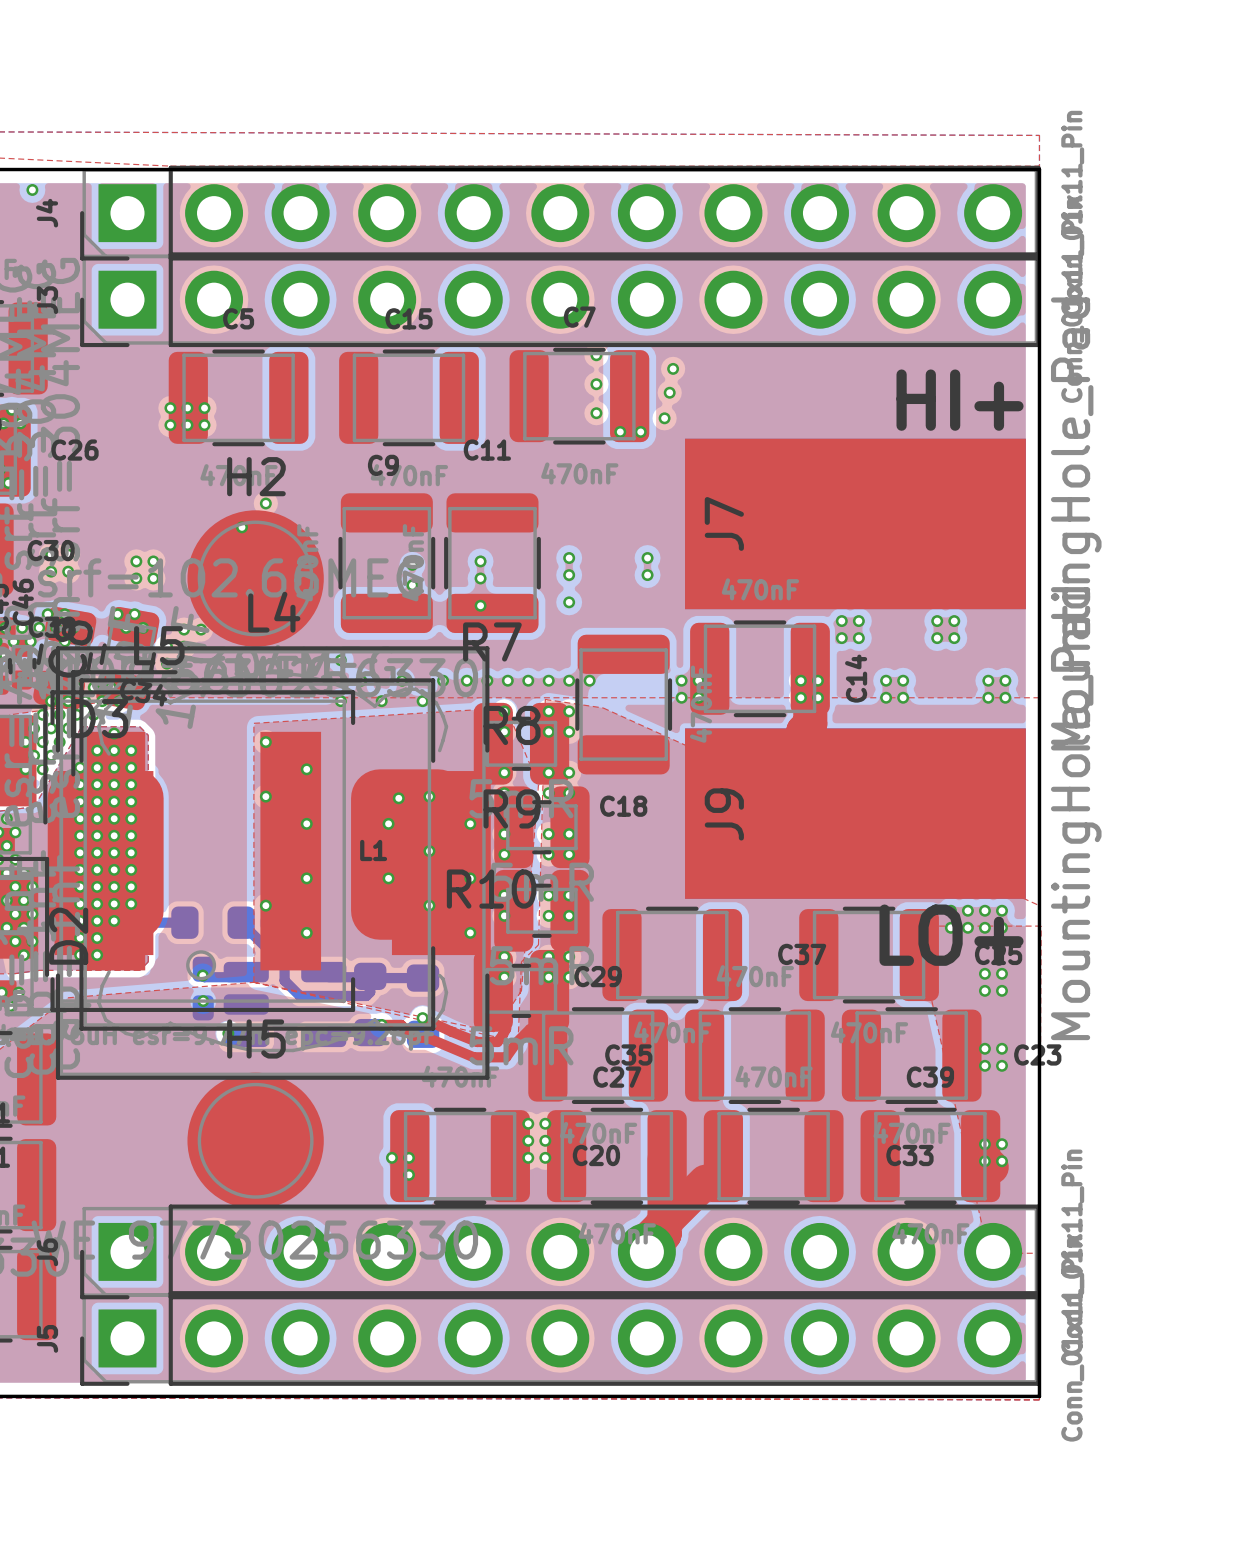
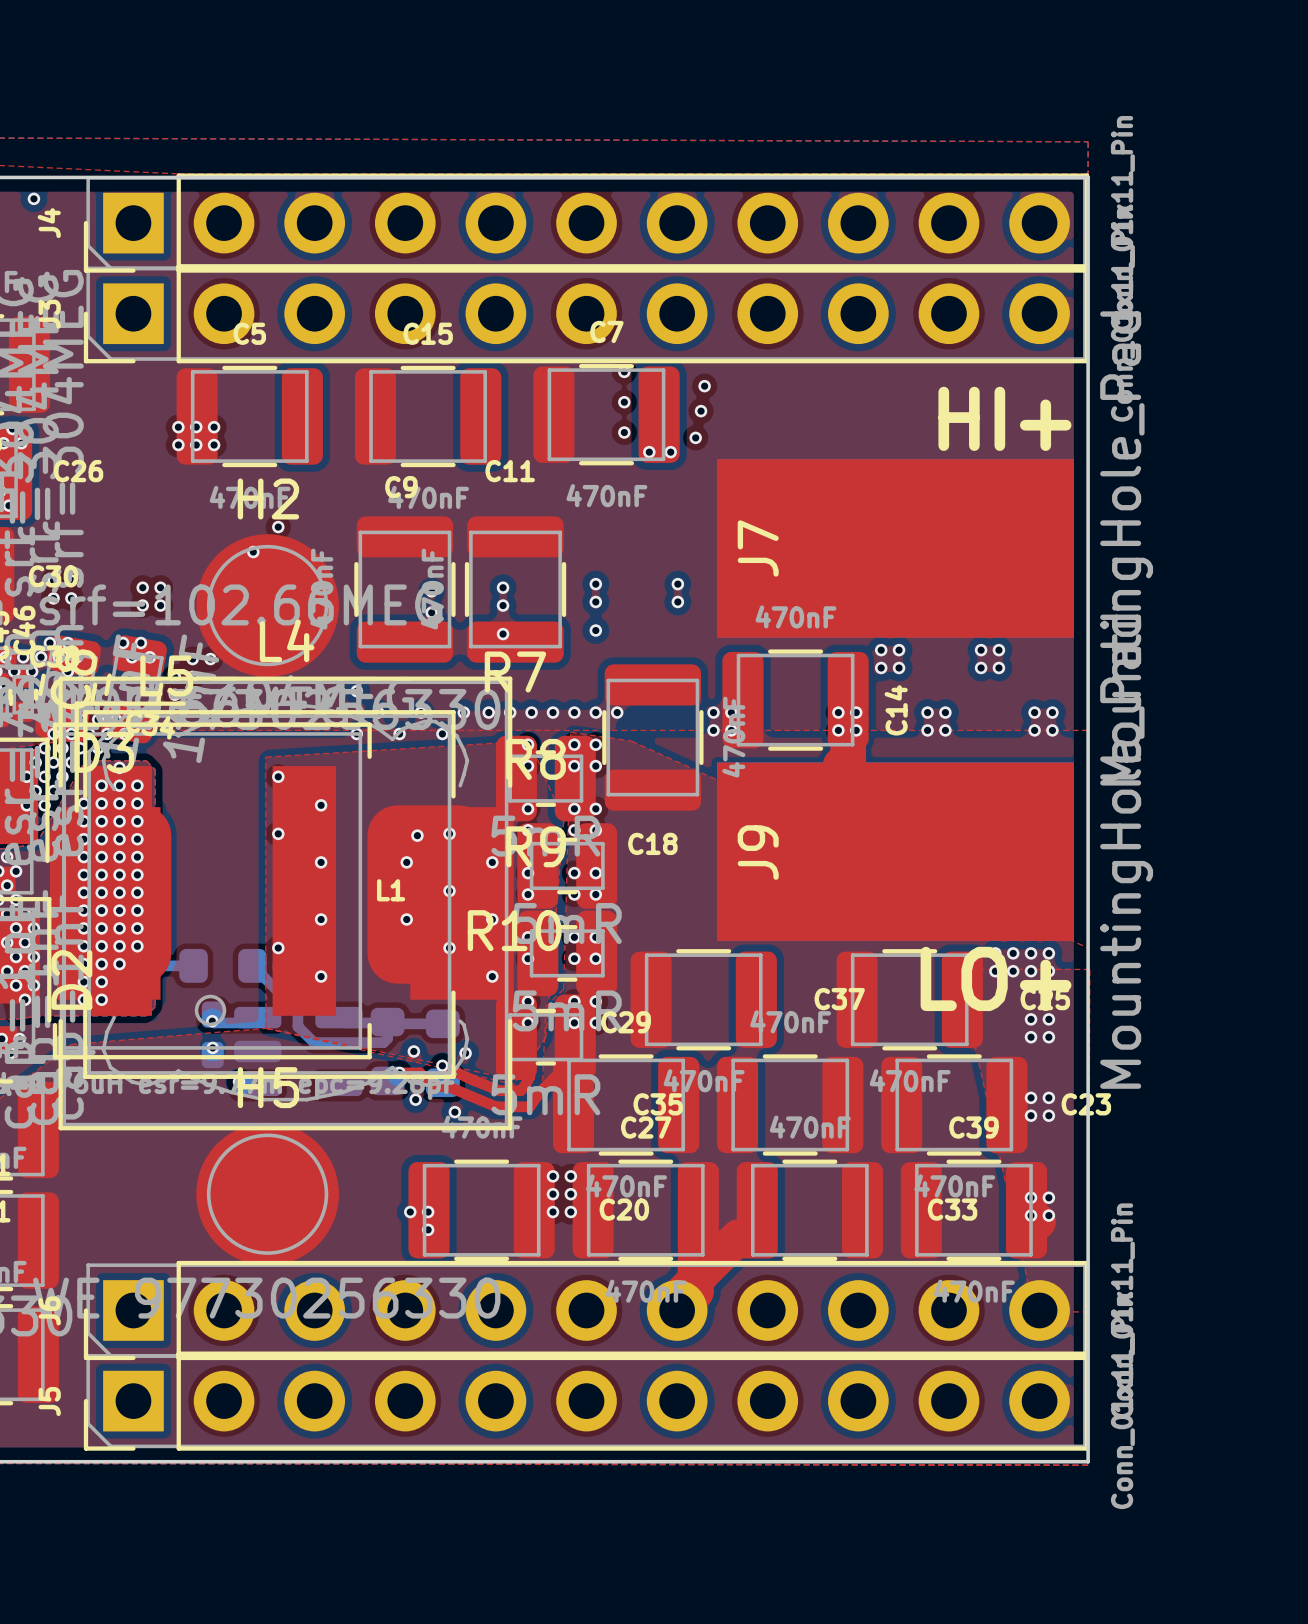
via: none -> (413, 1051)
via: none -> (465, 1053)
via: none -> (415, 1099)
via: none -> (454, 1112)

